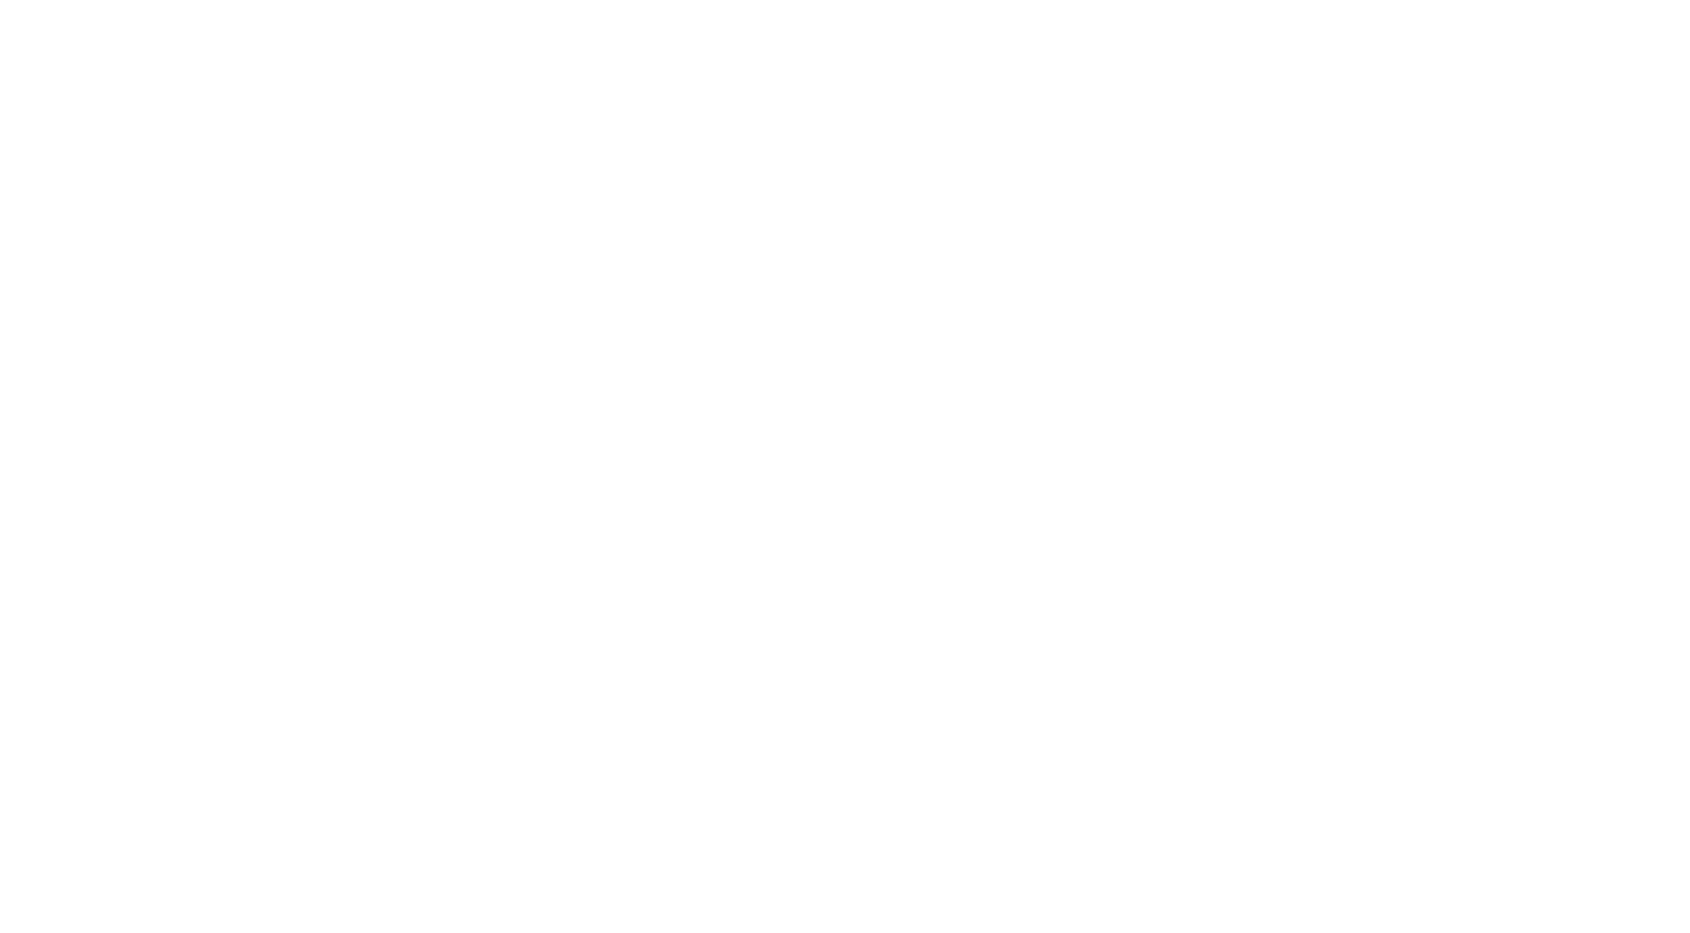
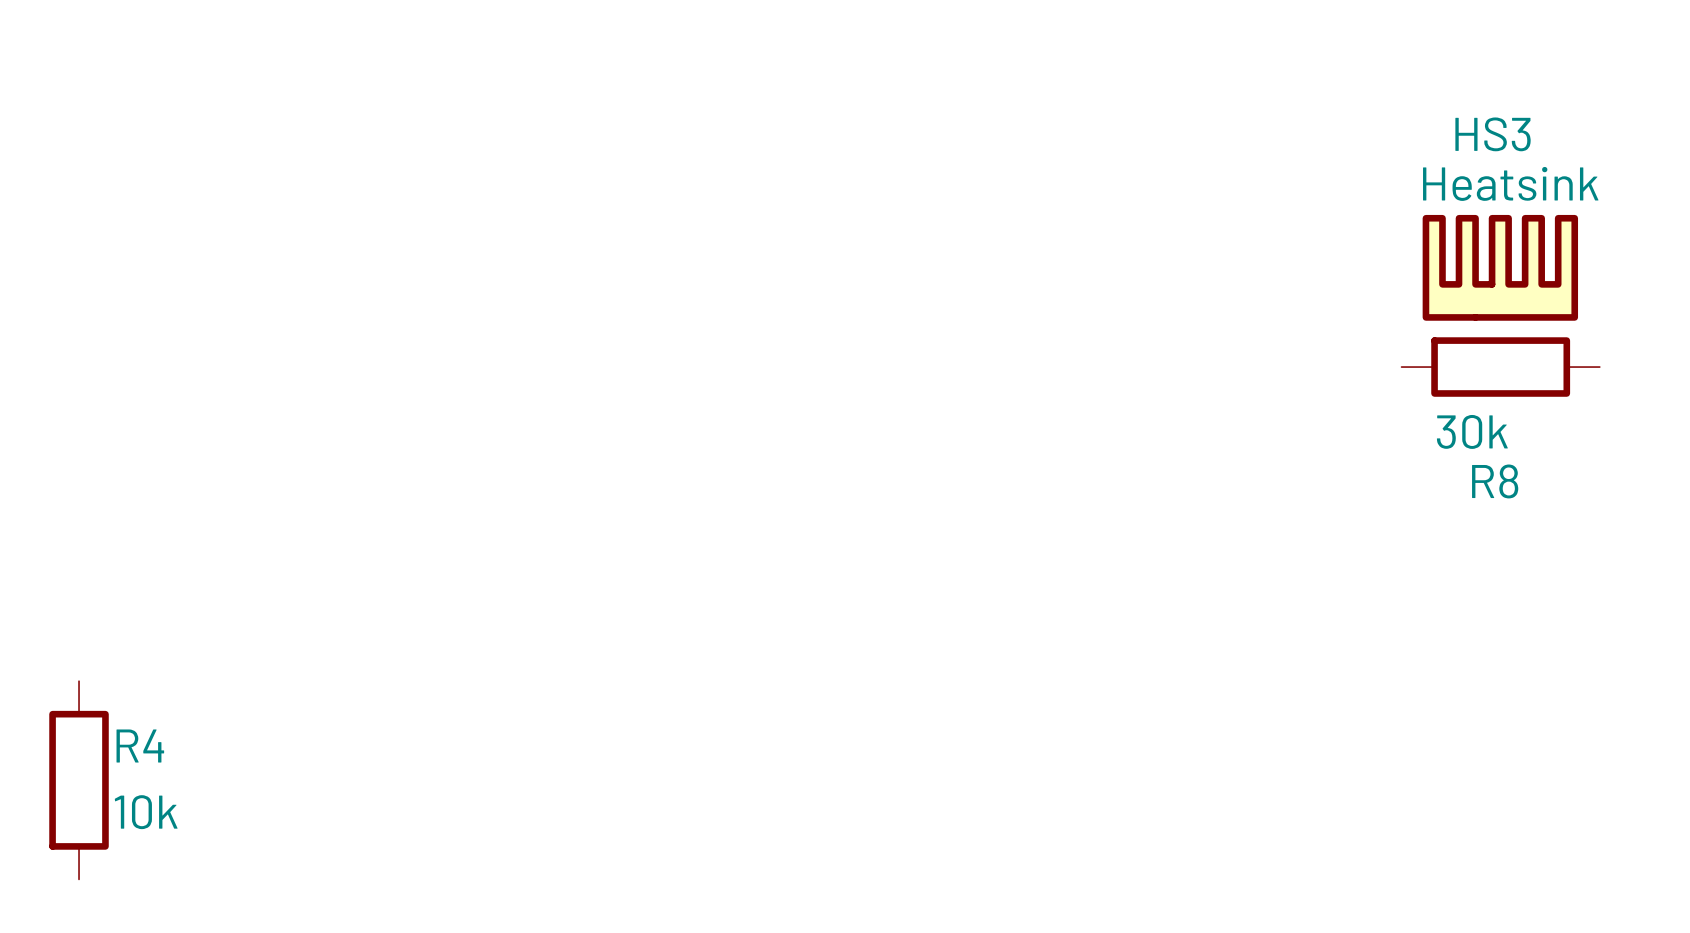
HS3: none -> Heatsink (1500, 267)
R8: none -> 30k (1500, 367)
R4: none -> 10k (79, 780)

